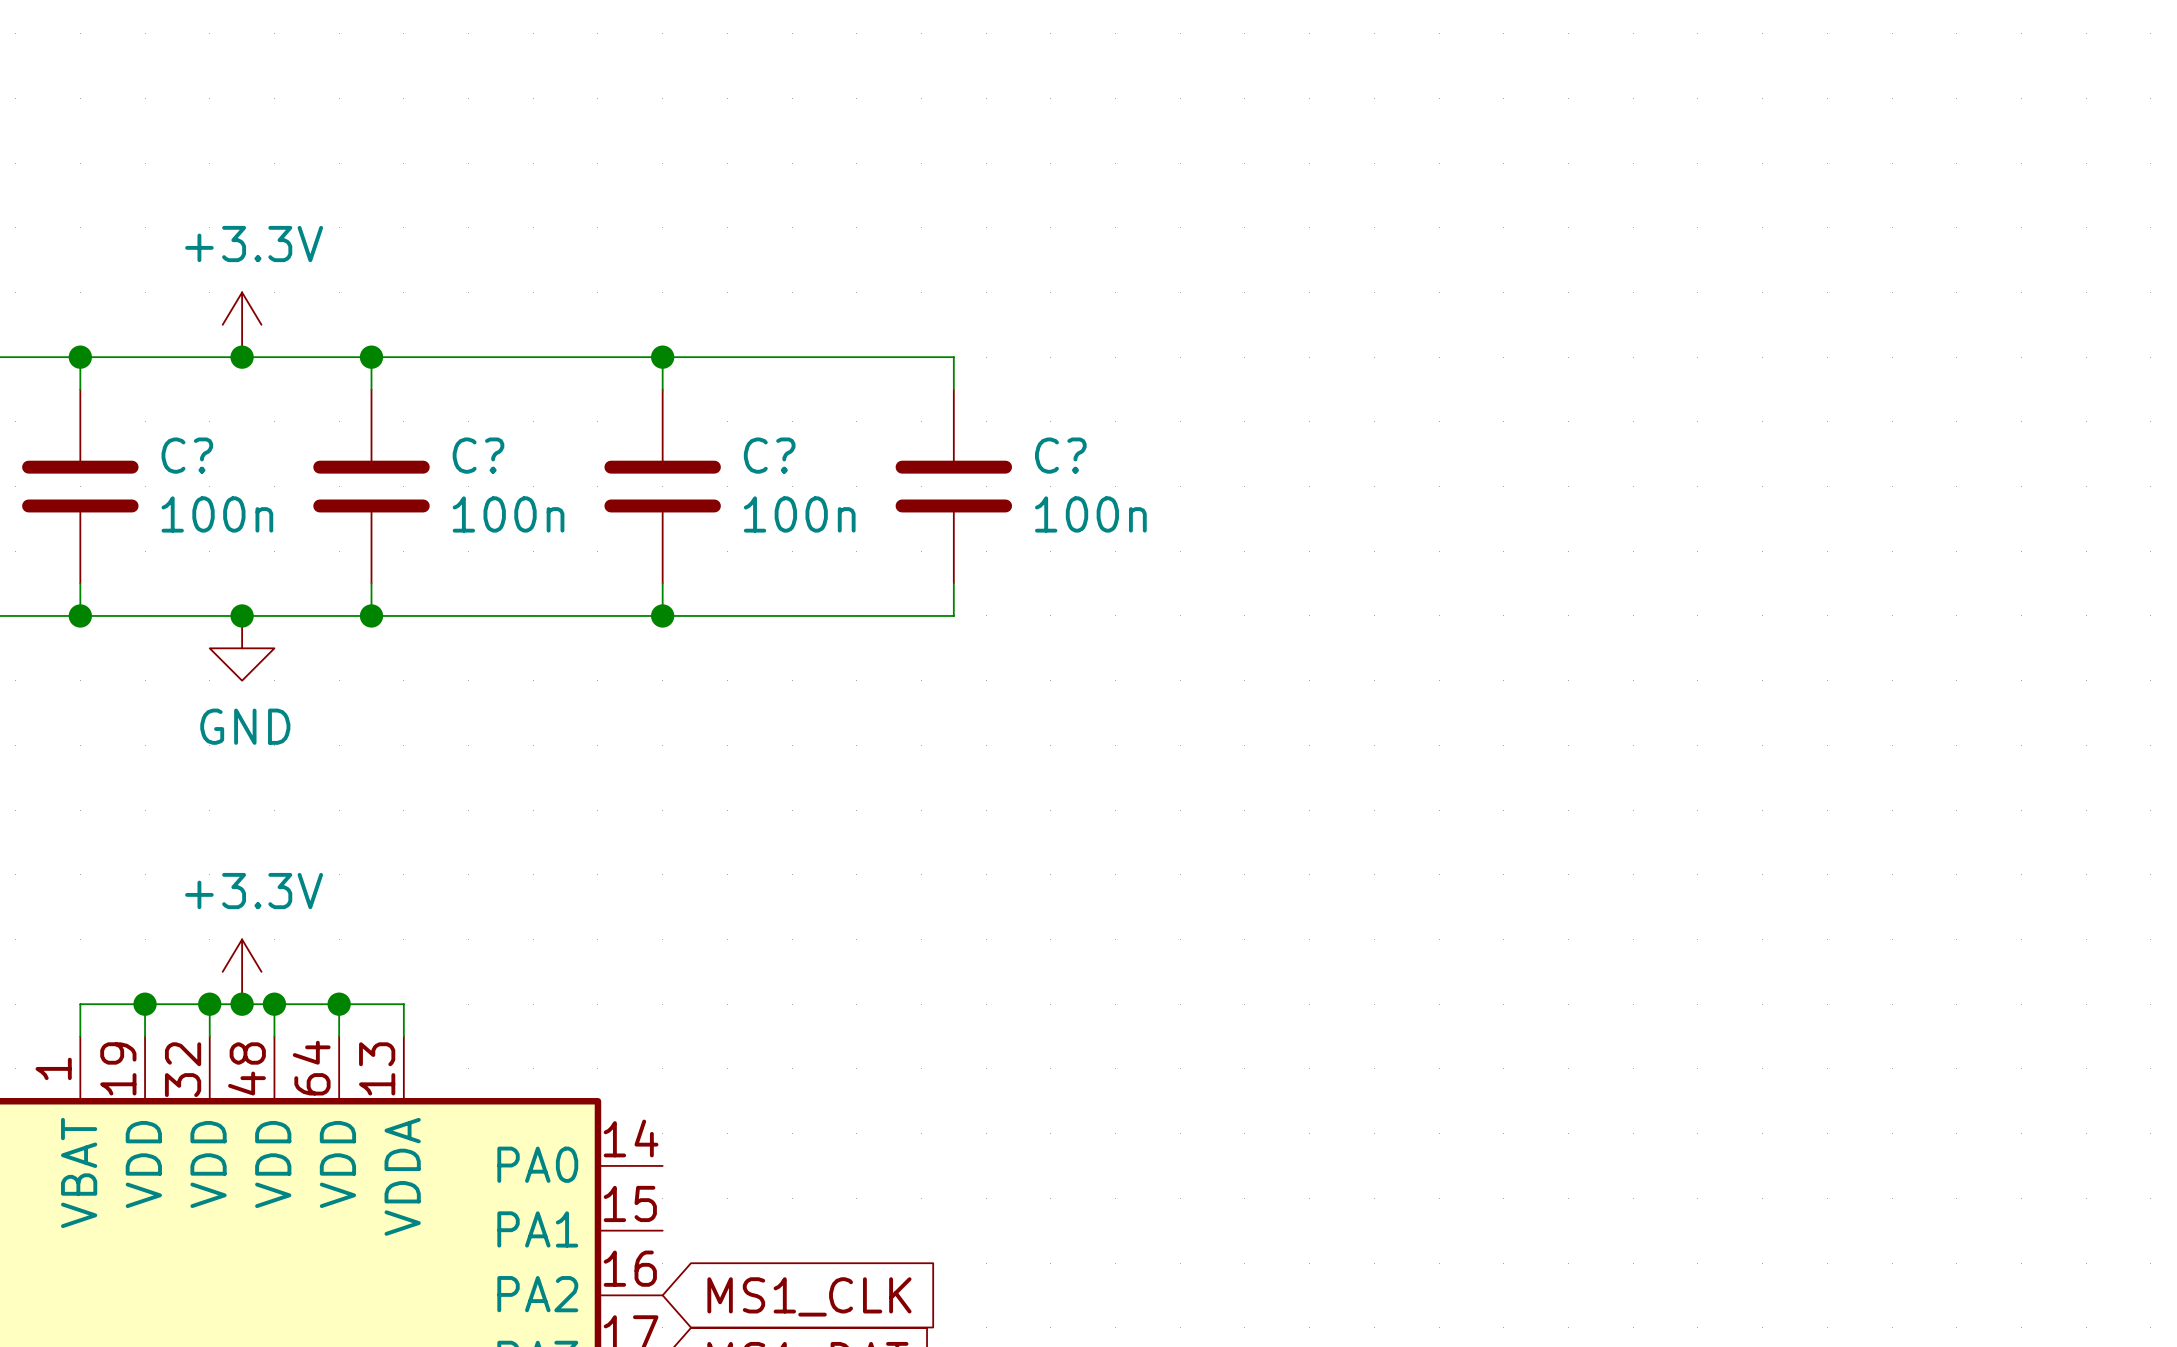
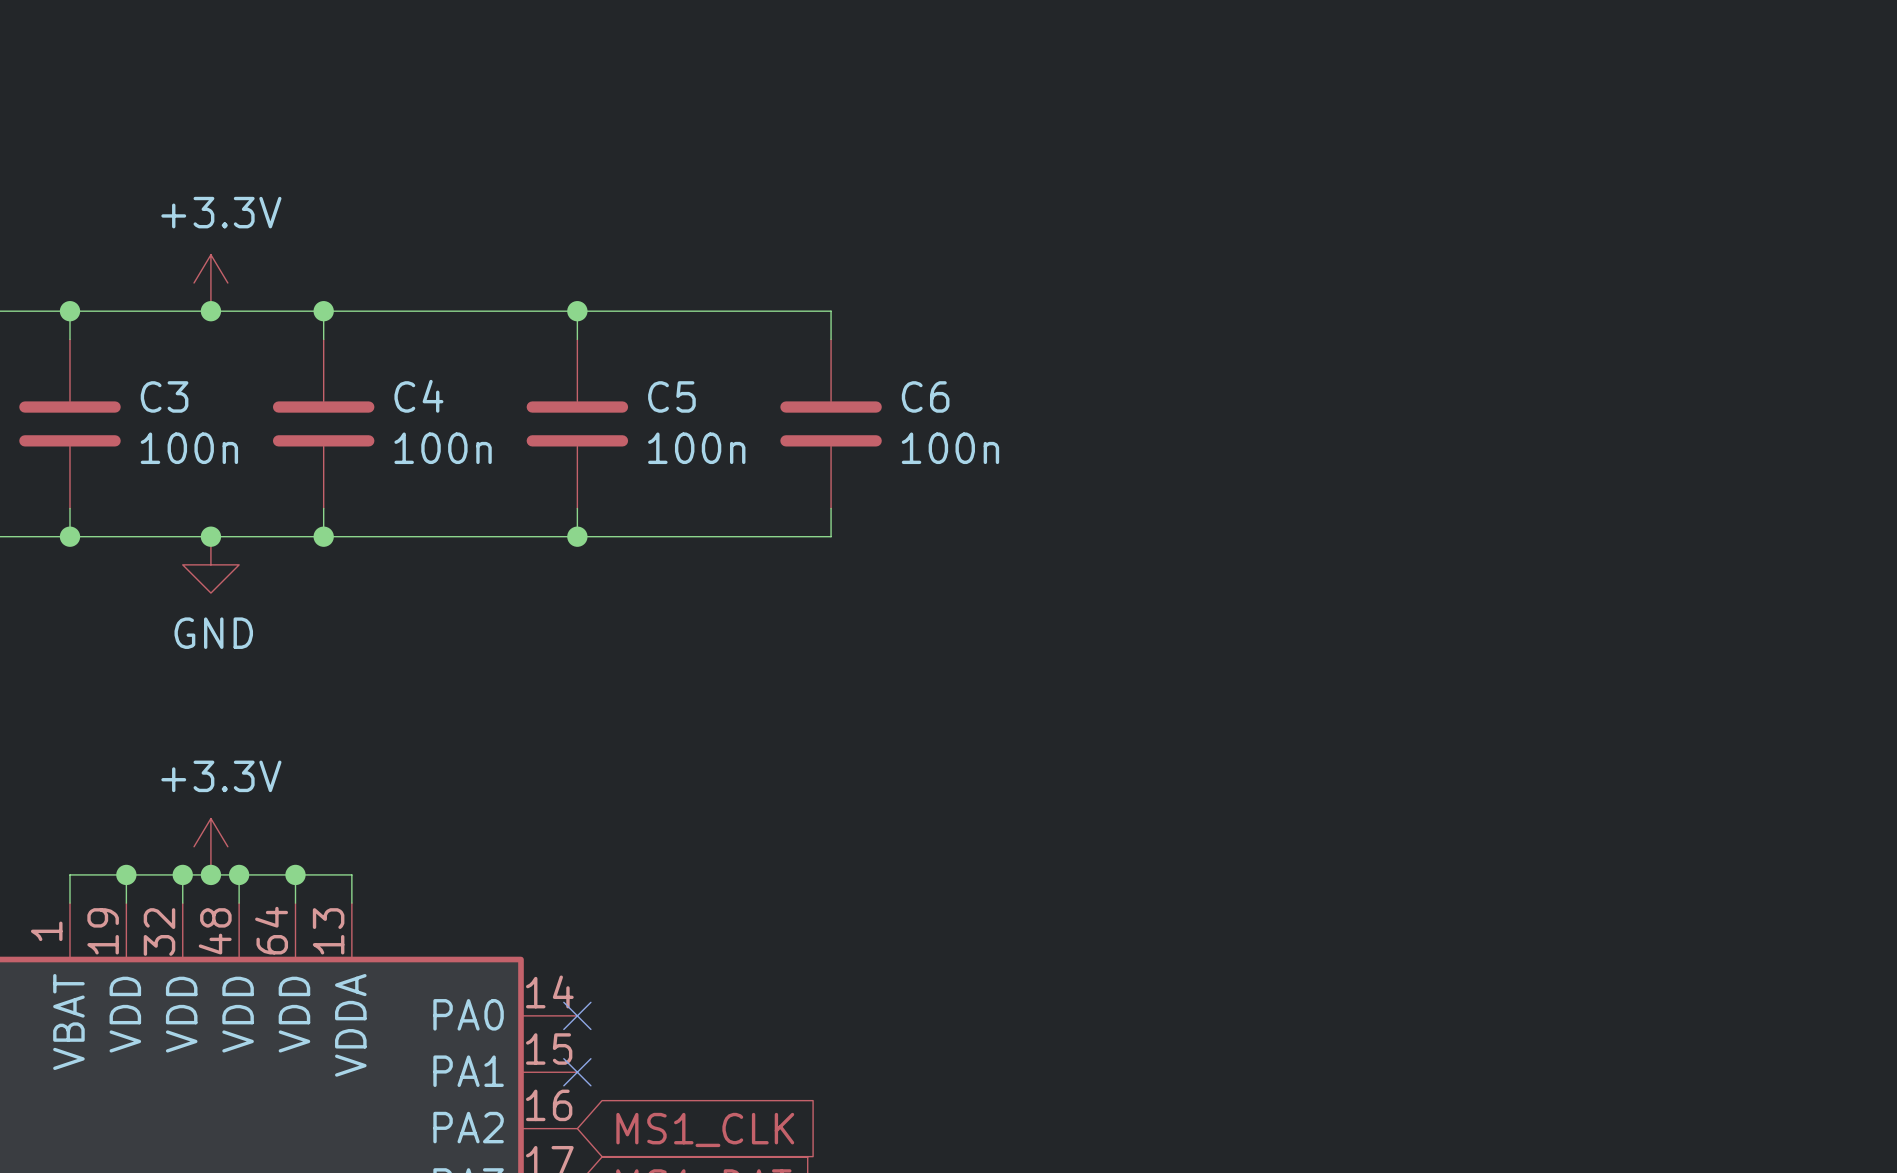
C? name: C? (187, 455) -> C3 (164, 396)
C? name: C? (478, 455) -> C4 (418, 396)
C? name: C? (769, 455) -> C5 (671, 396)
C? name: C? (1060, 455) -> C6 (925, 396)
no-connect mark: none -> (577, 1015)
no-connect mark: none -> (577, 1072)

